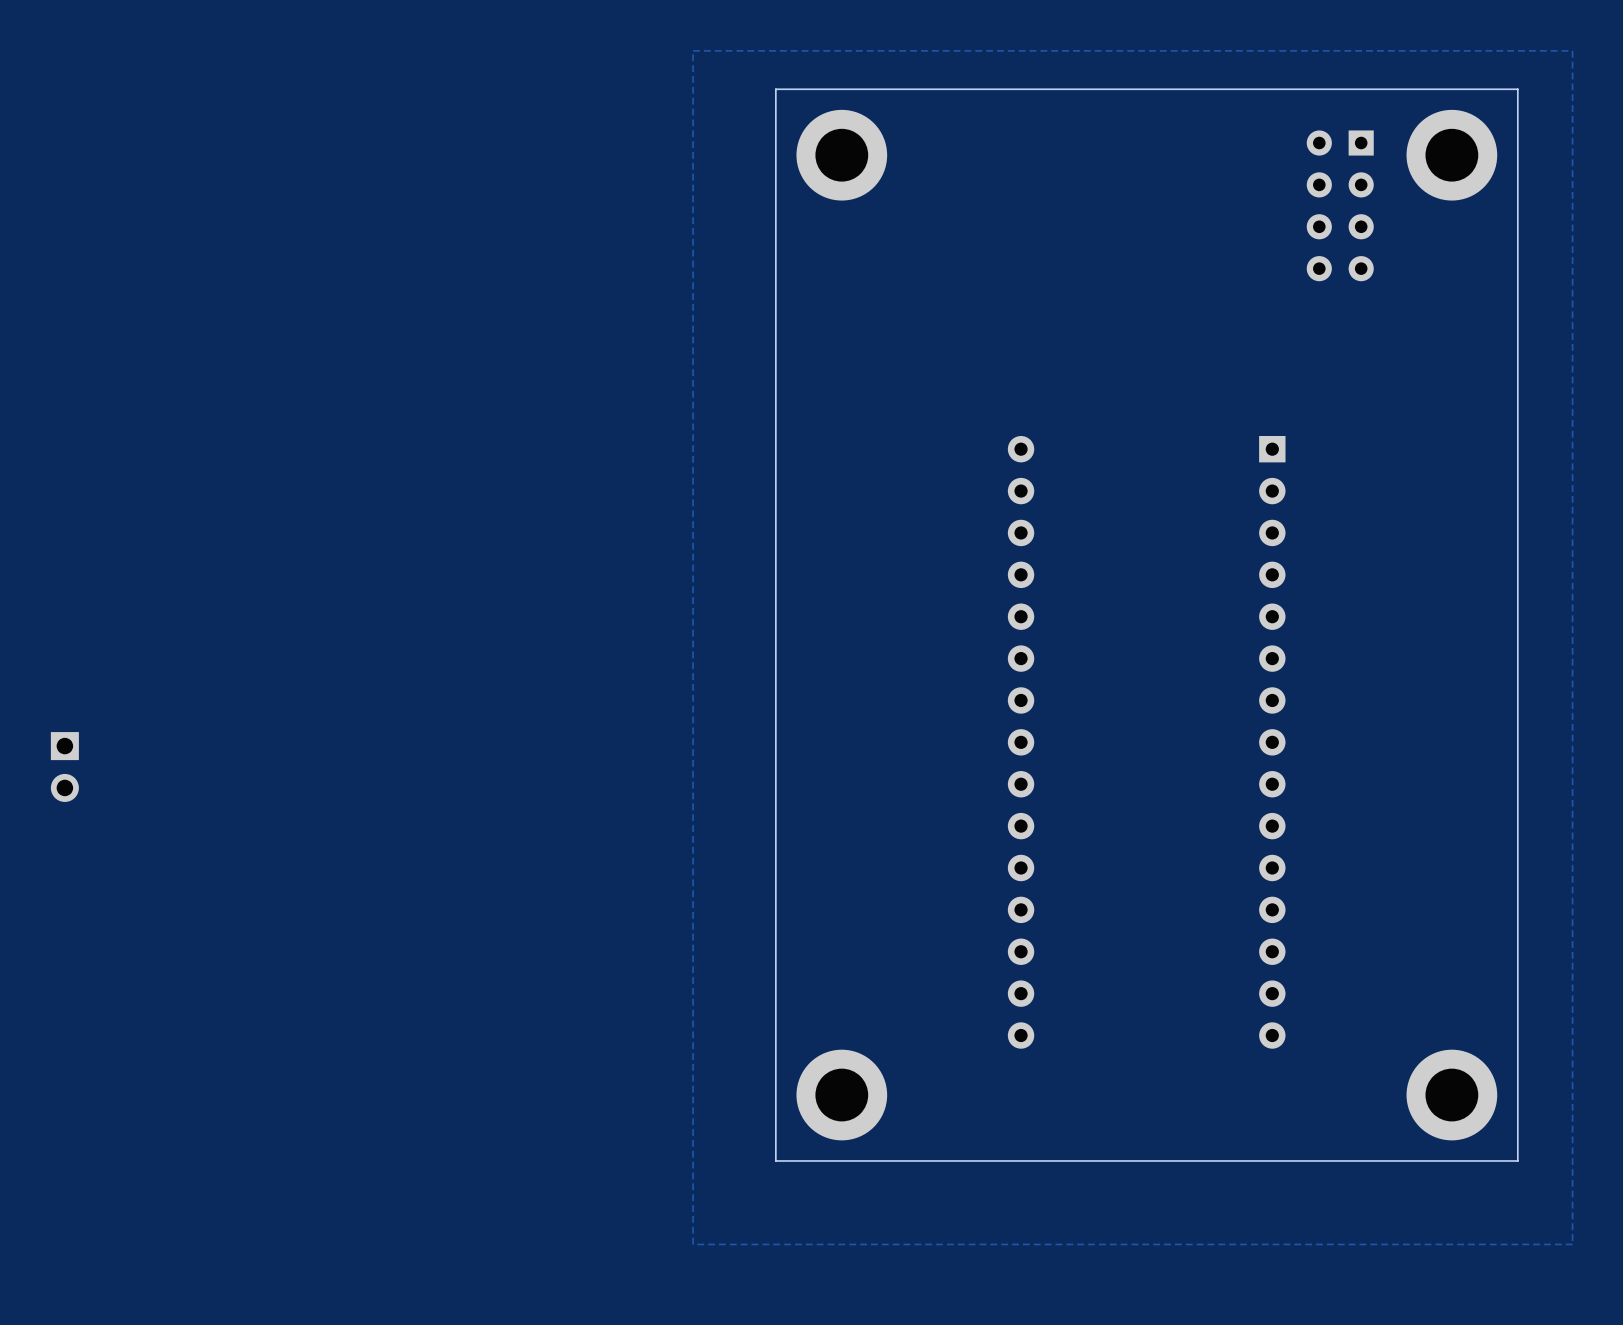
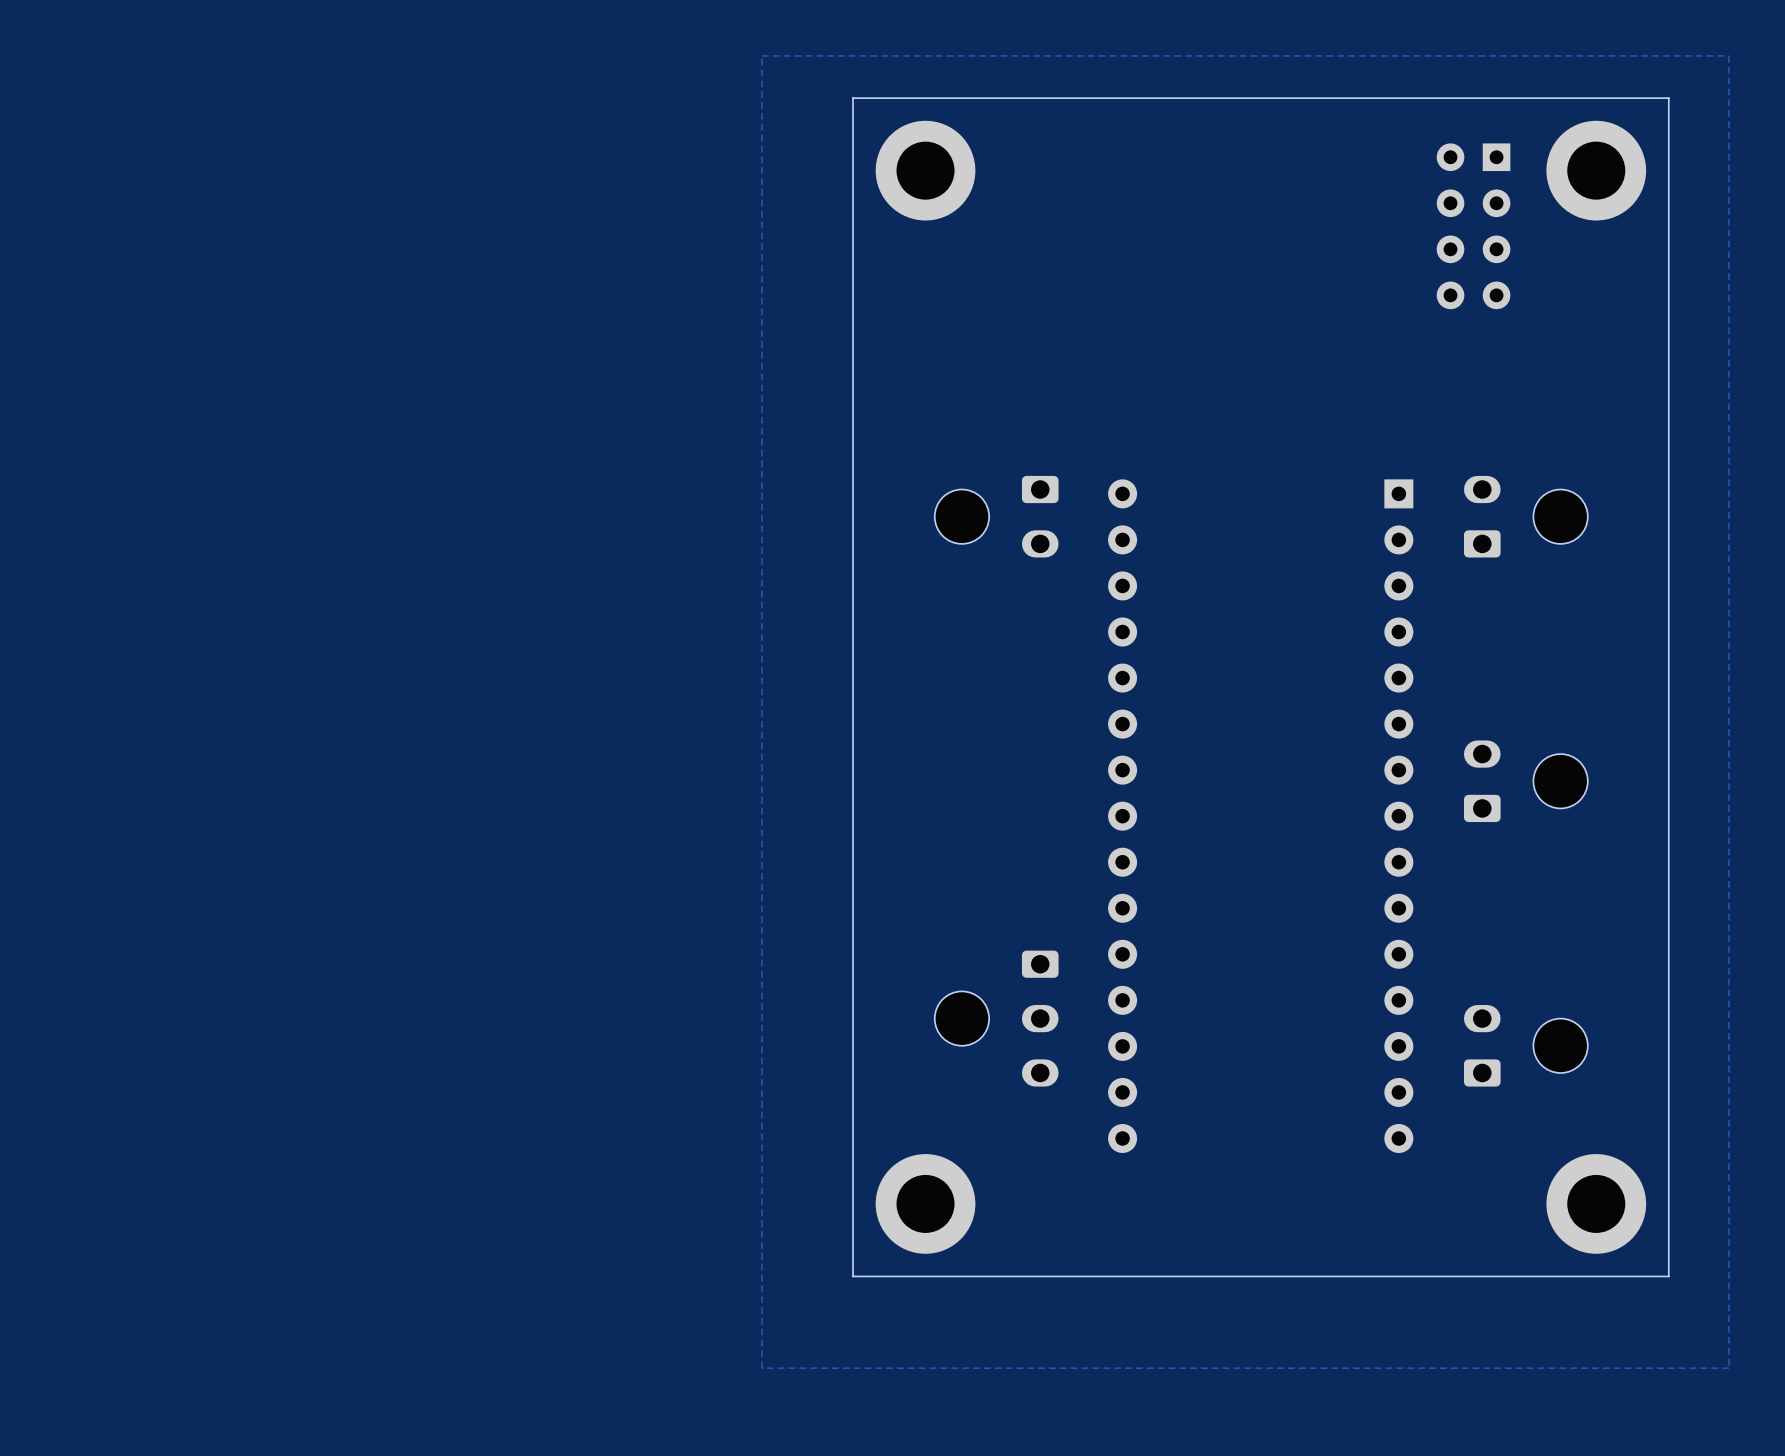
part: none -> (996, 516)
part: none -> (1525, 516)
part: none -> (1525, 781)
part: (64, 767) -> none
part: none -> (996, 1018)
part: none -> (1525, 1045)

